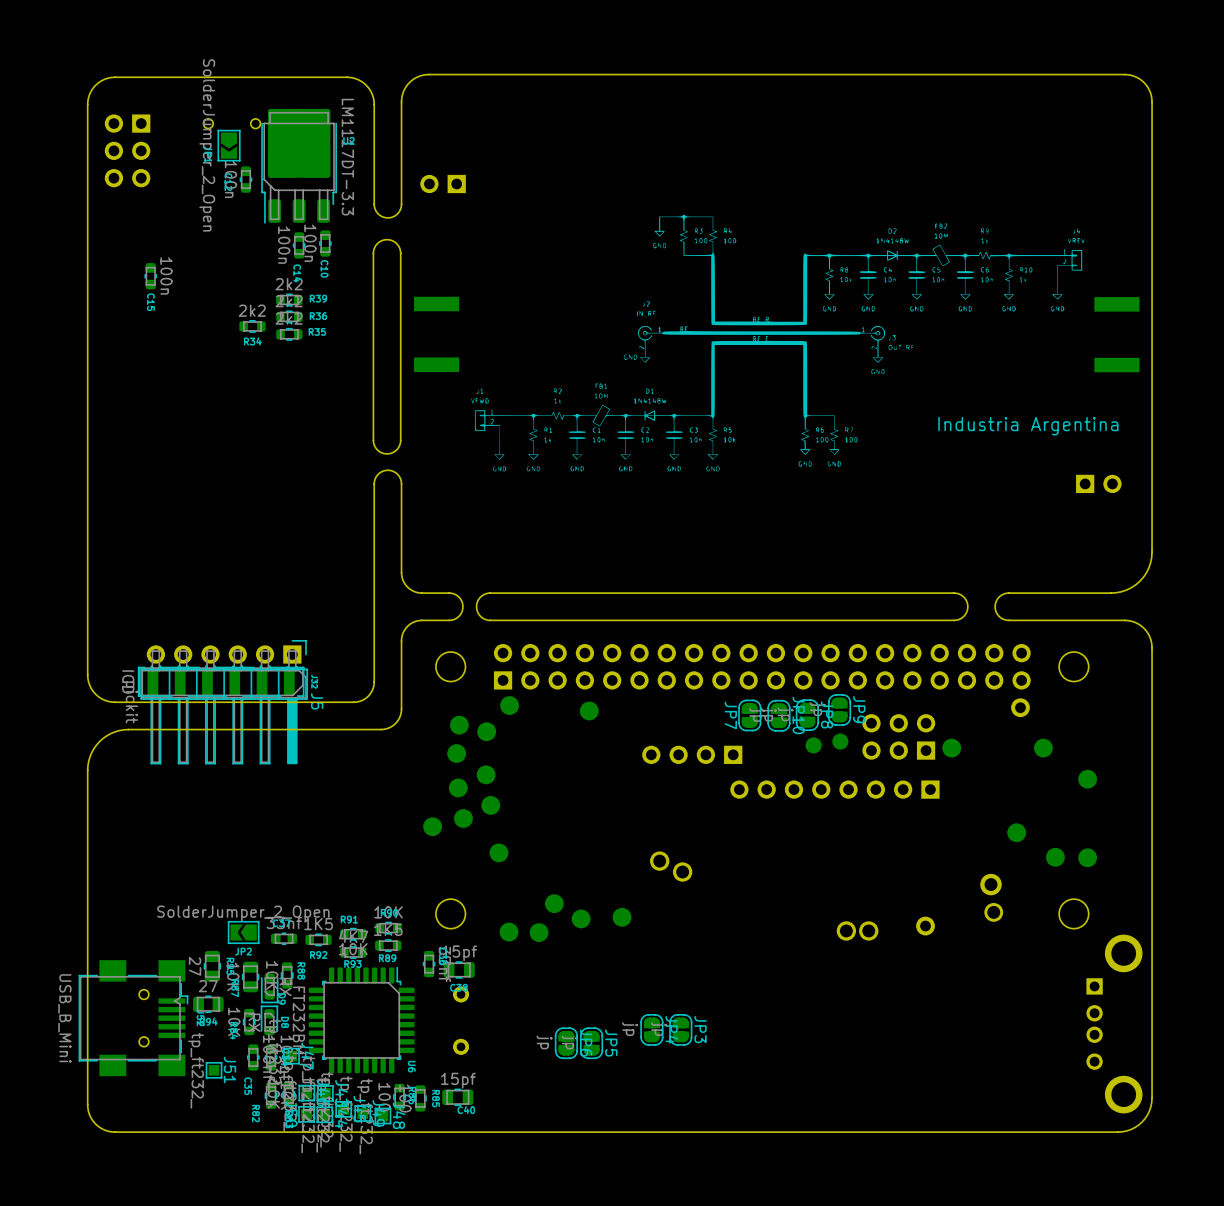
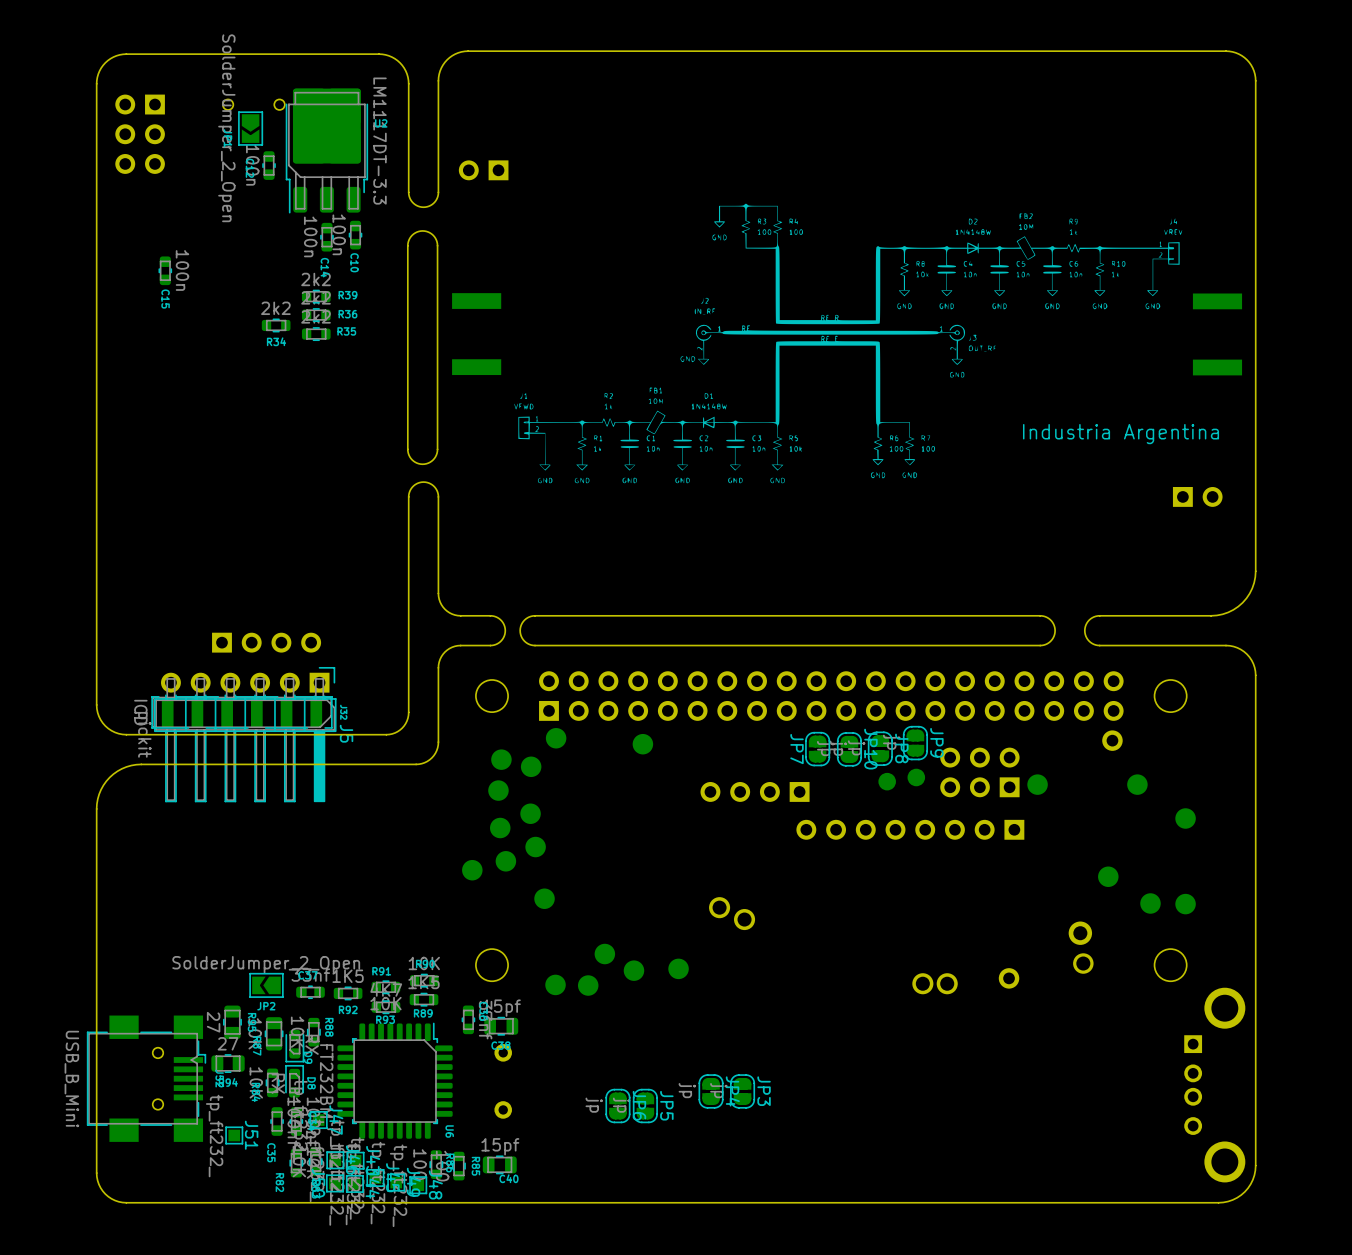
part: none -> (266, 642)

